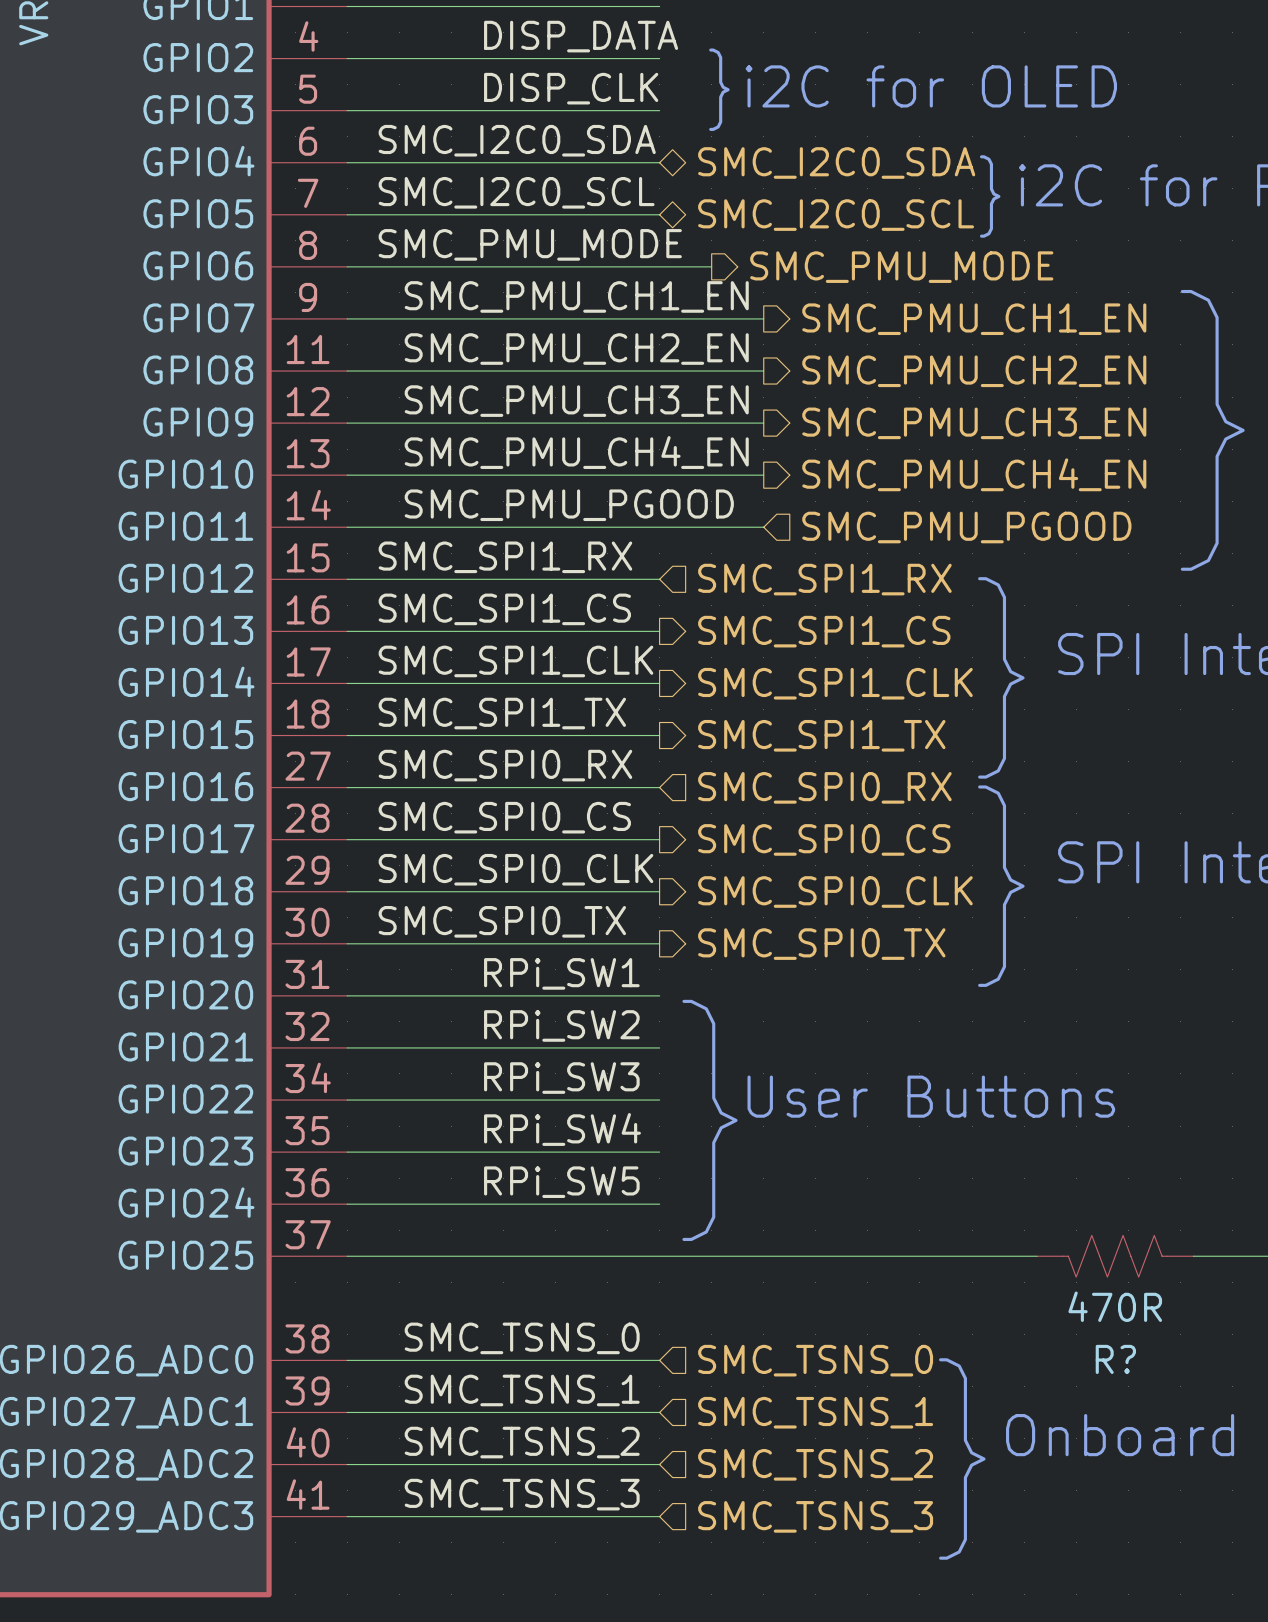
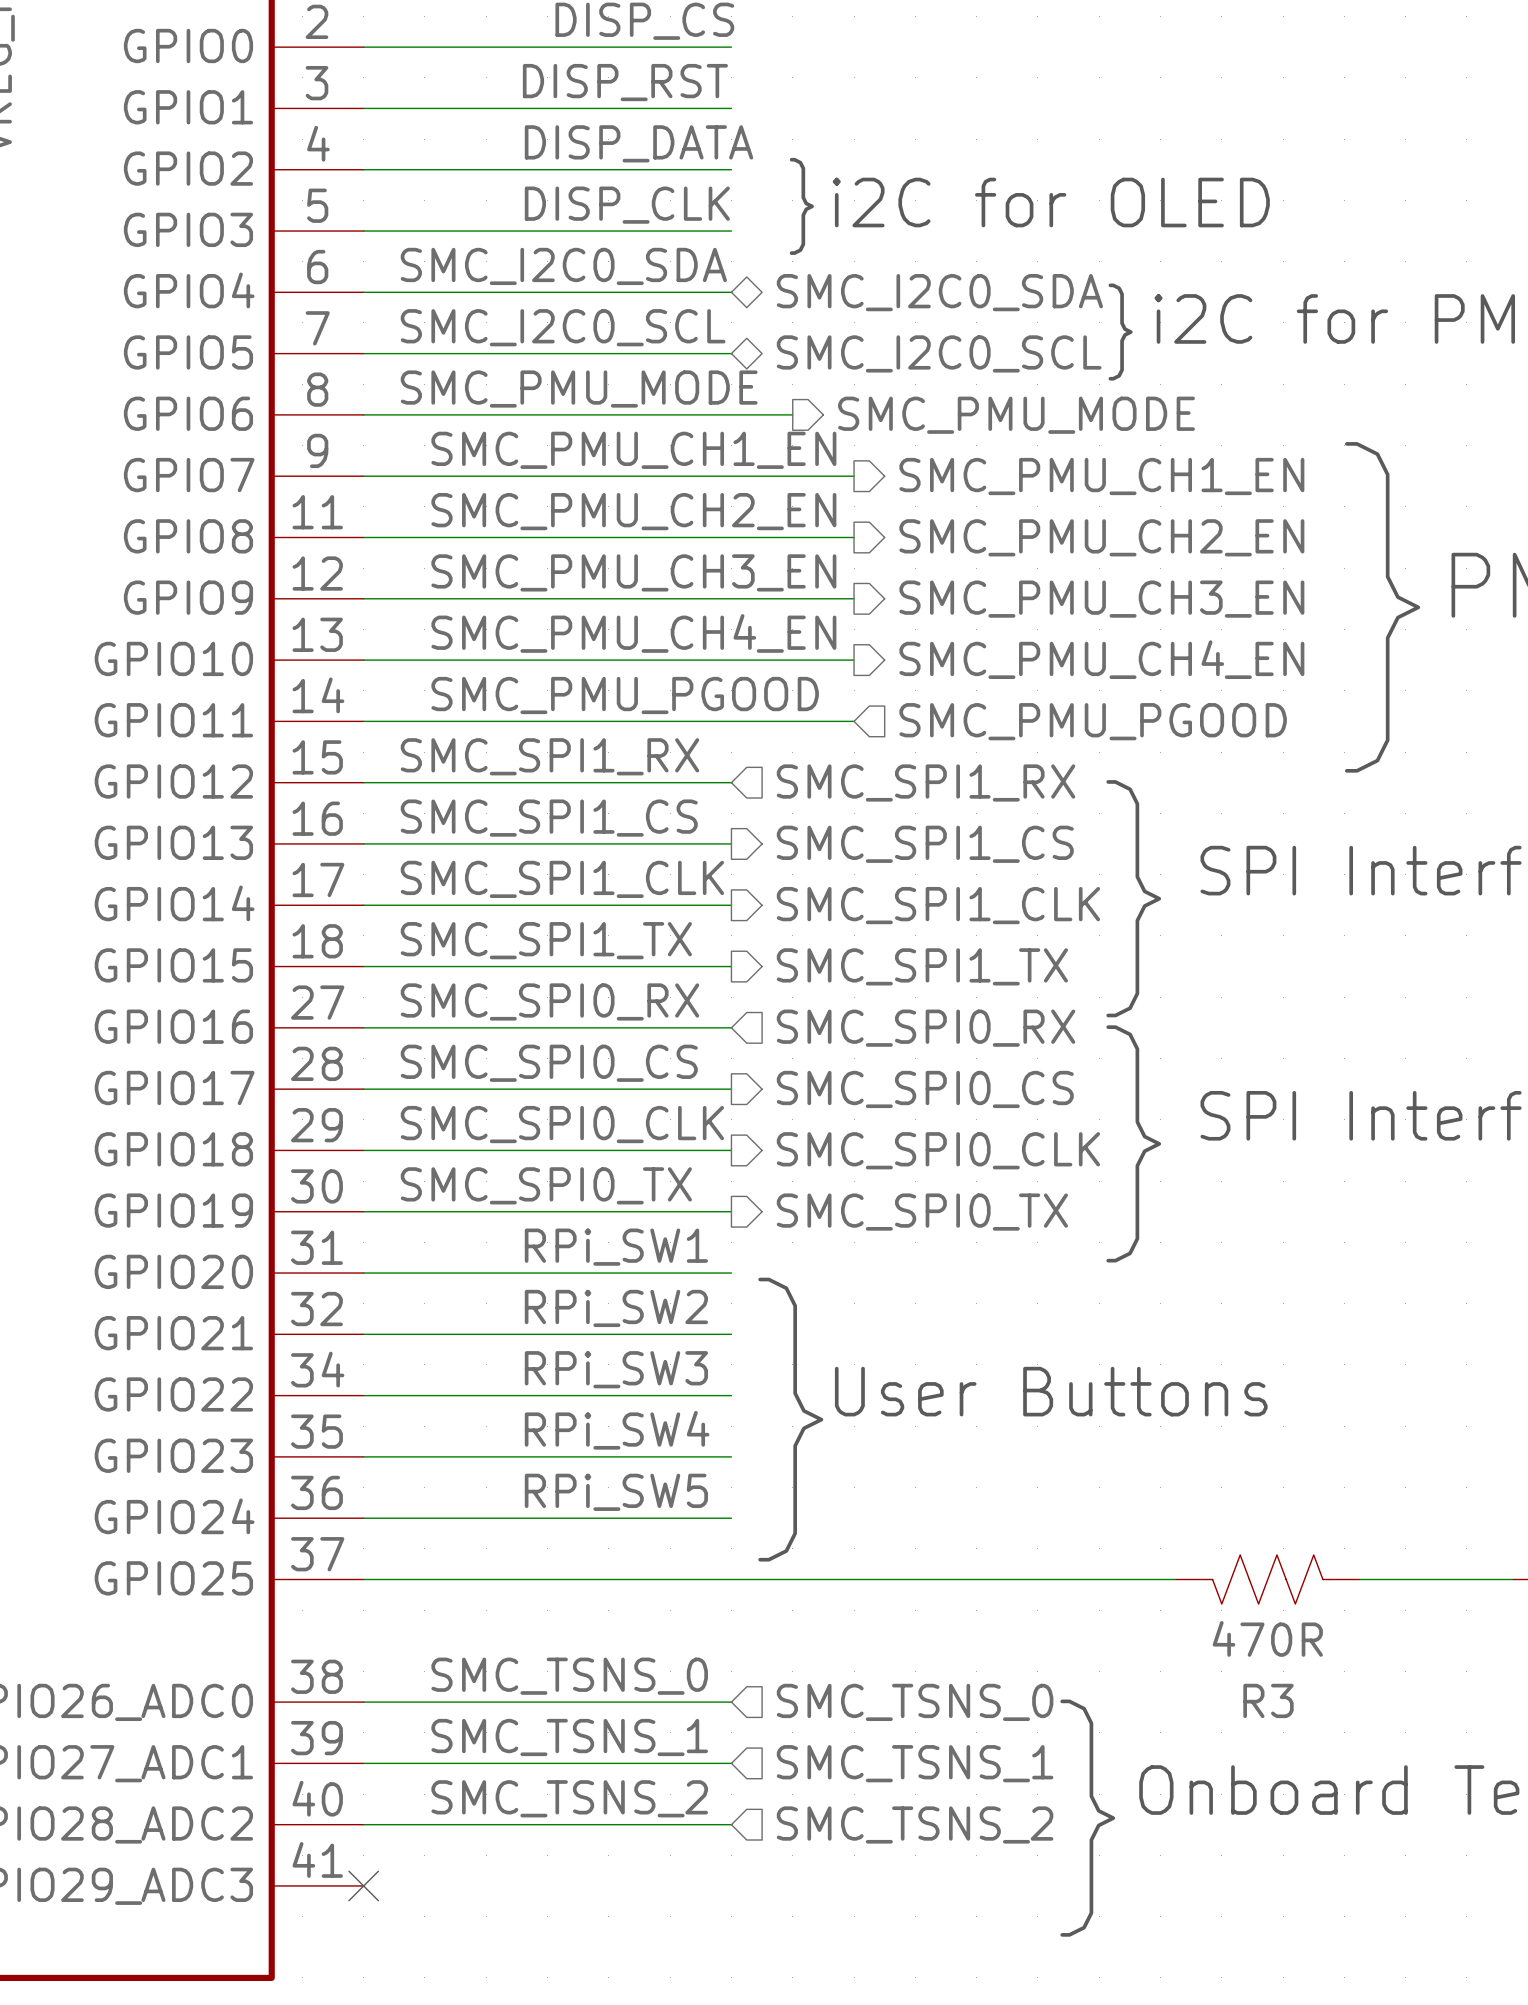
R? name: R? (1115, 1359) -> R3 (1268, 1700)
label: SMC_TSNS_3 (522, 1494) -> none
wire: (347, 1516) (659, 1516) -> none
no-connect mark: none -> (363, 1885)
hierarchical label: SMC_TSNS_3 (815, 1516) -> none

